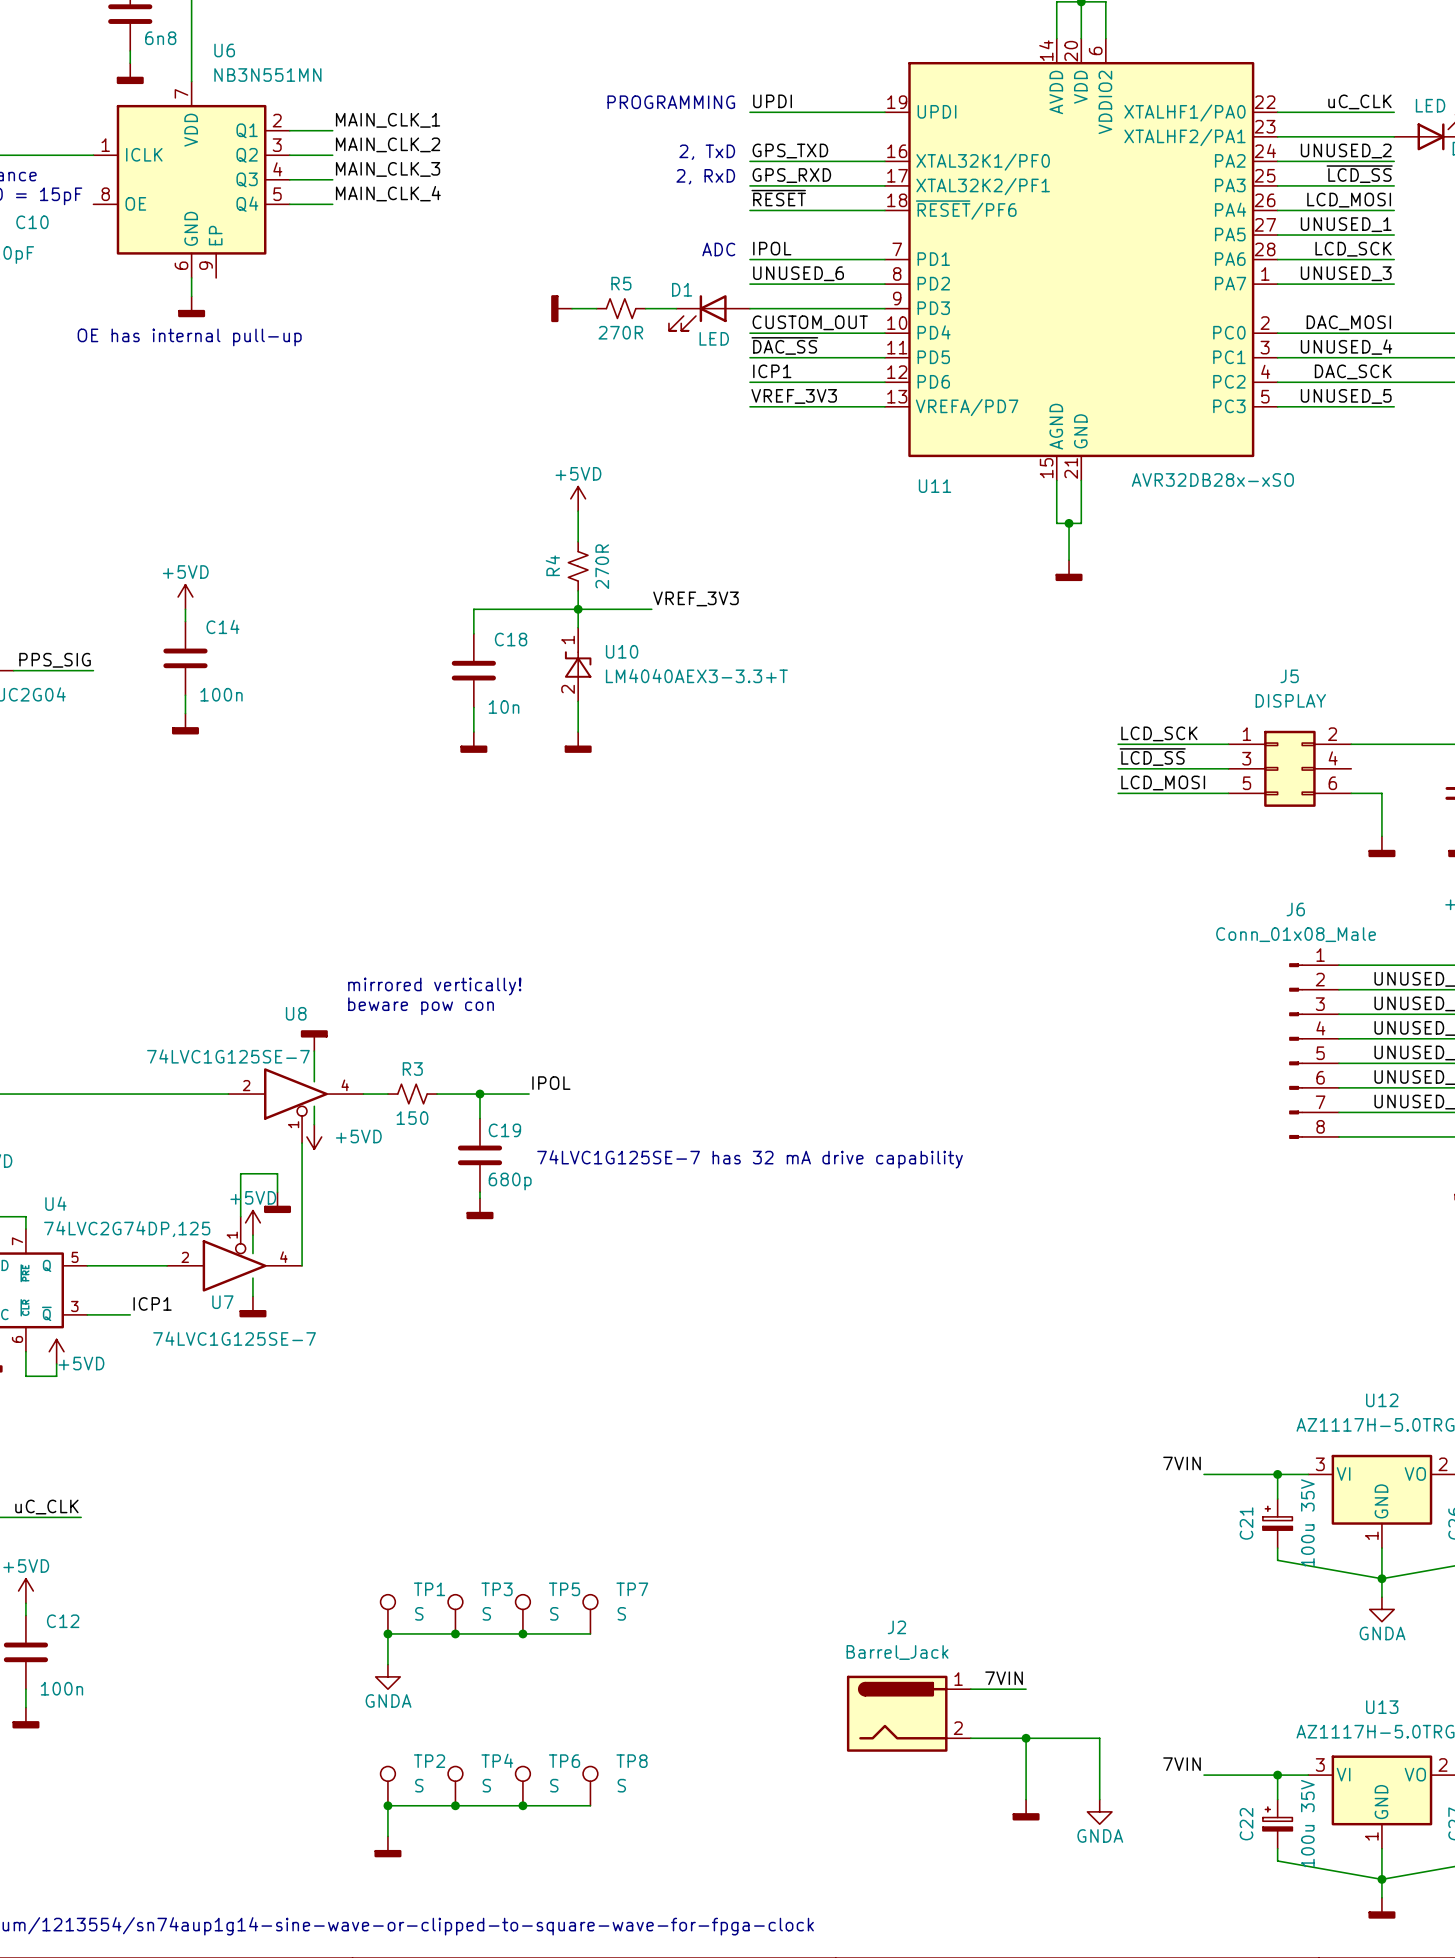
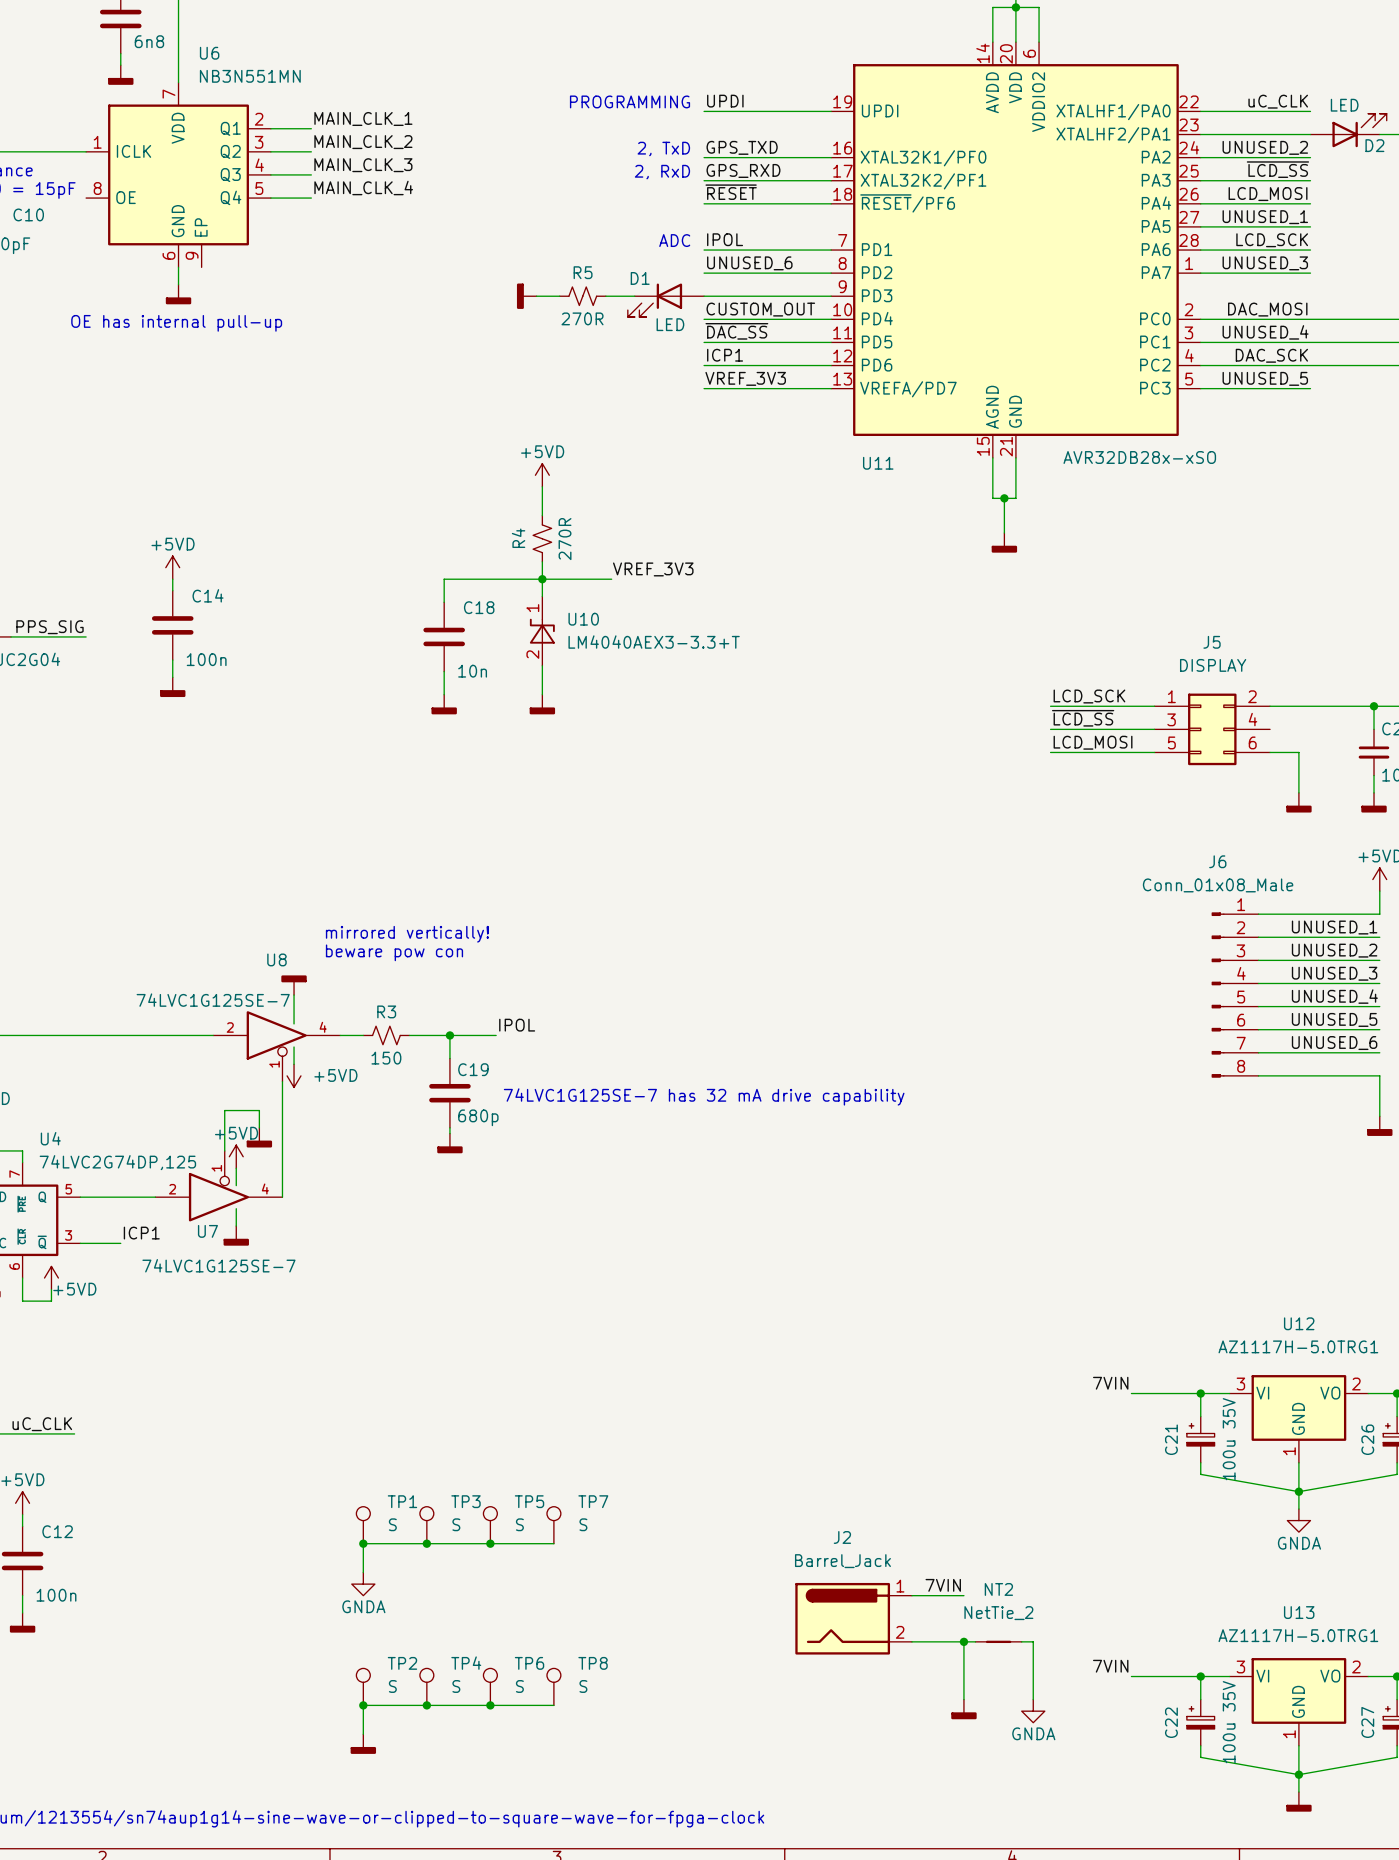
NT2: none -> NetTie_2 (998, 1641)

